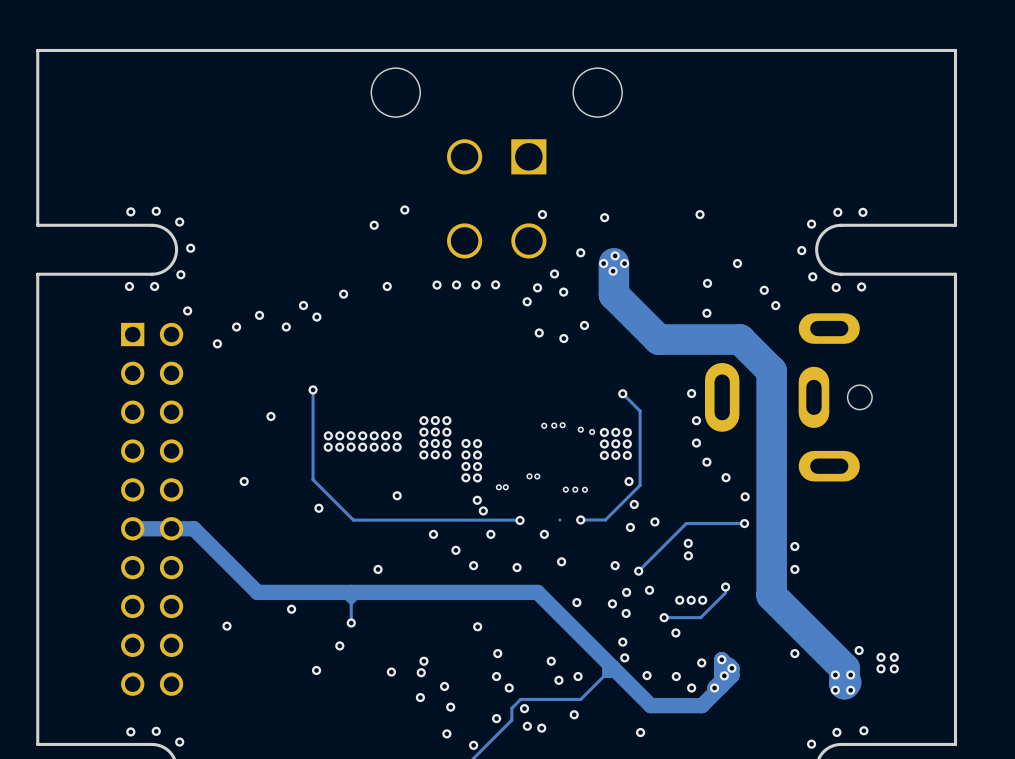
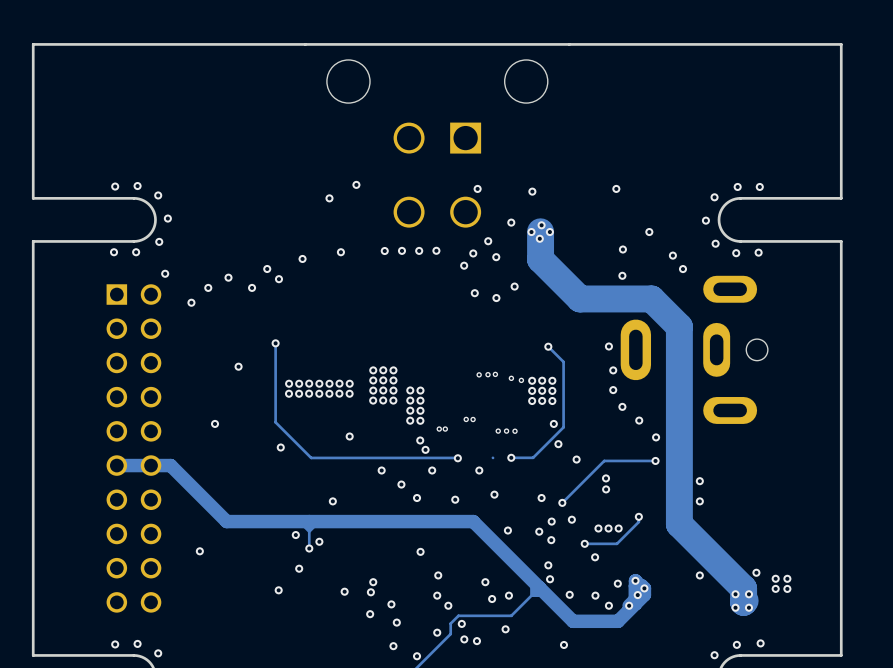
via: (630, 527) -> none
via: none -> (295, 535)
via: (291, 609) -> none
via: none -> (319, 541)

